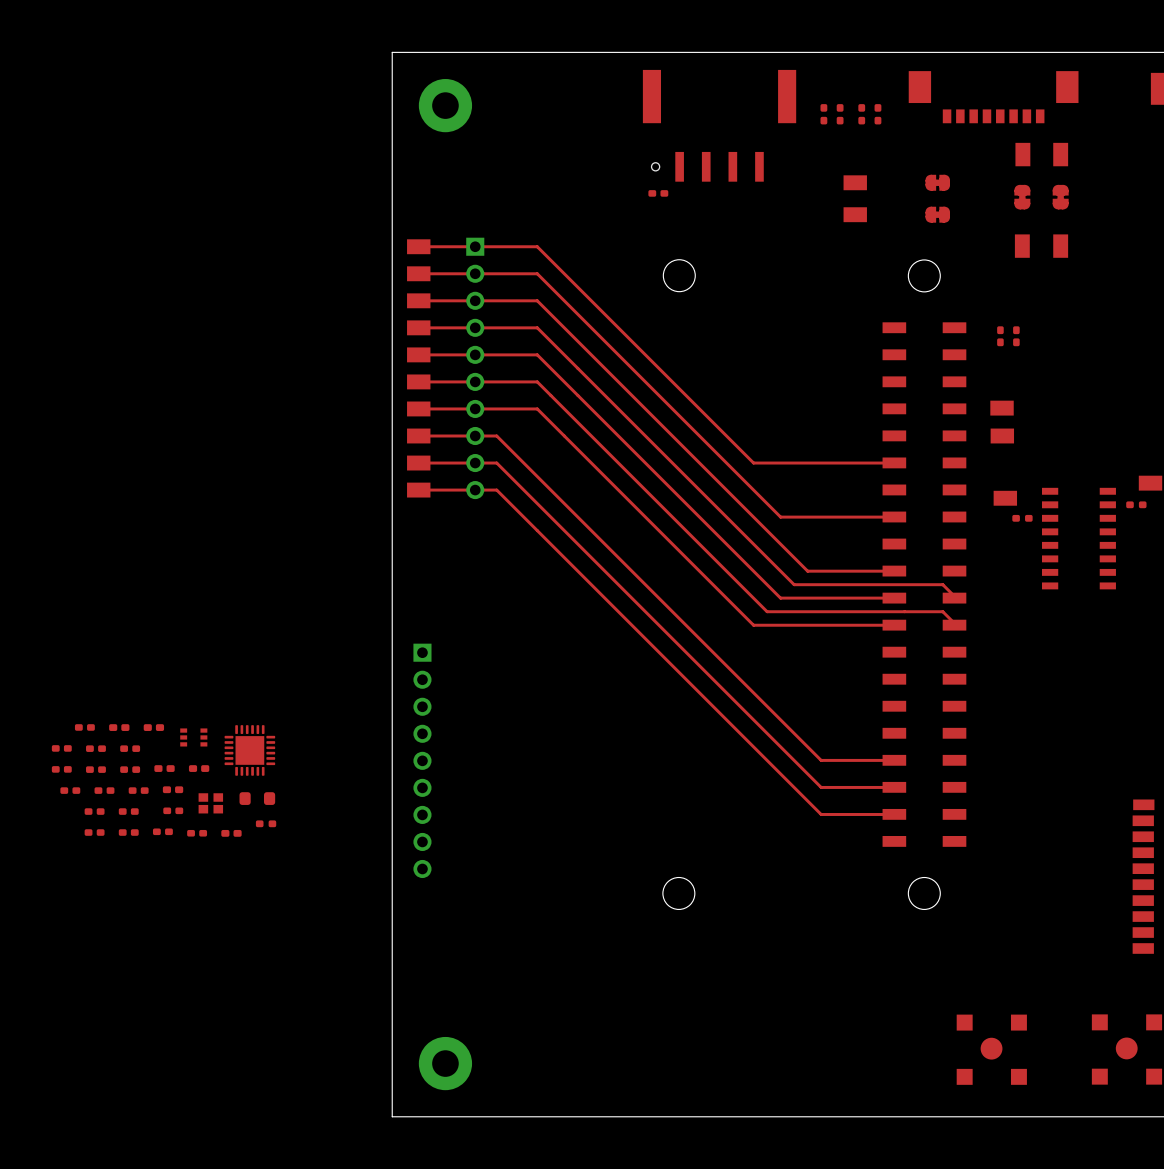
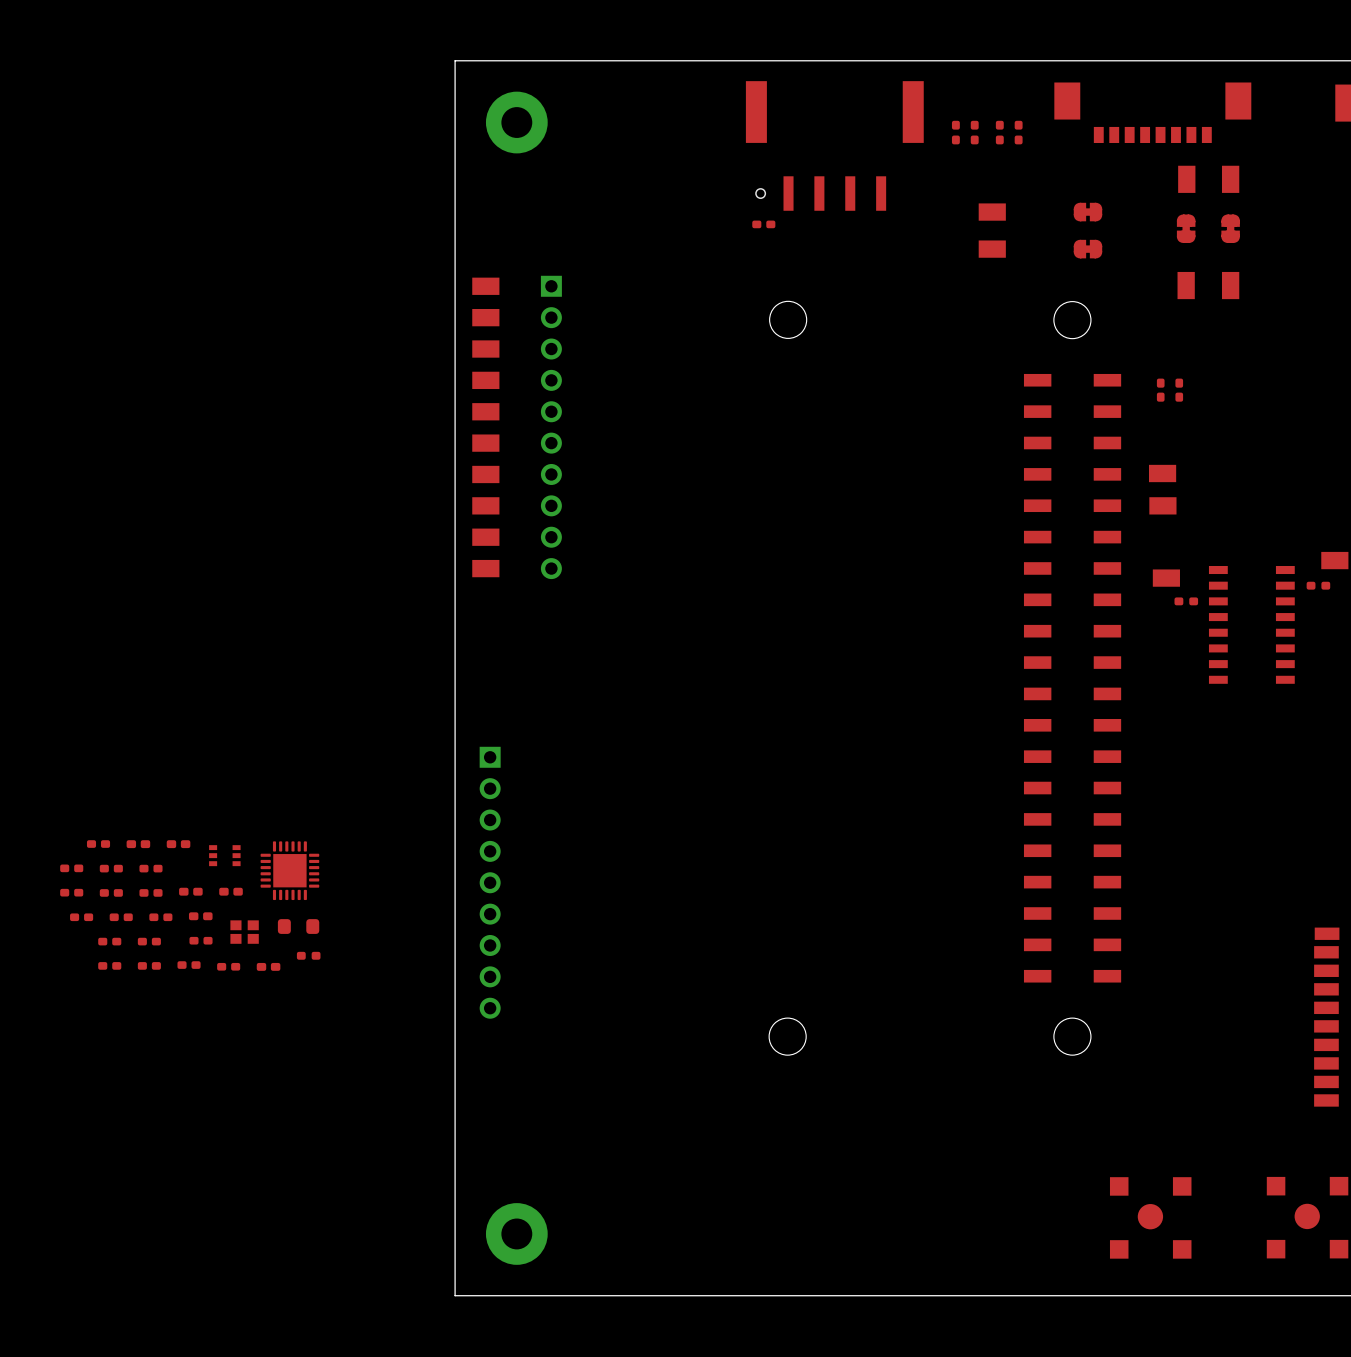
top track: (469, 246) (418, 246) -> none
top track: (475, 246) (537, 246) (753, 463) (888, 463) -> none
top track: (418, 273) (537, 273) (780, 517) (888, 517) -> none
top track: (469, 300) (418, 300) -> none
top track: (475, 300) (537, 300) (807, 571) (902, 571) -> none
top track: (469, 327) (418, 327) -> none
top track: (475, 327) (537, 327) (794, 584) (942, 584) (956, 598) -> none
top track: (418, 354) (537, 354) (780, 598) -> none
top track: (469, 381) (418, 381) -> none
top track: (475, 381) (537, 381) (767, 611) (942, 611) (956, 625) -> none
top track: (469, 408) (418, 408) -> none
top track: (475, 408) (537, 408) (753, 625) (888, 625) -> none
top track: (469, 435) (418, 435) -> none
top track: (475, 435) (496, 435) (821, 760) (888, 760) -> none
top track: (469, 463) (418, 463) -> none
top track: (475, 463) (496, 463) (821, 787) (888, 787) -> none
top track: (469, 490) (418, 490) -> none
top track: (475, 490) (496, 490) (821, 814) (888, 814) -> none
top track: (894, 598) (780, 598) -> none

